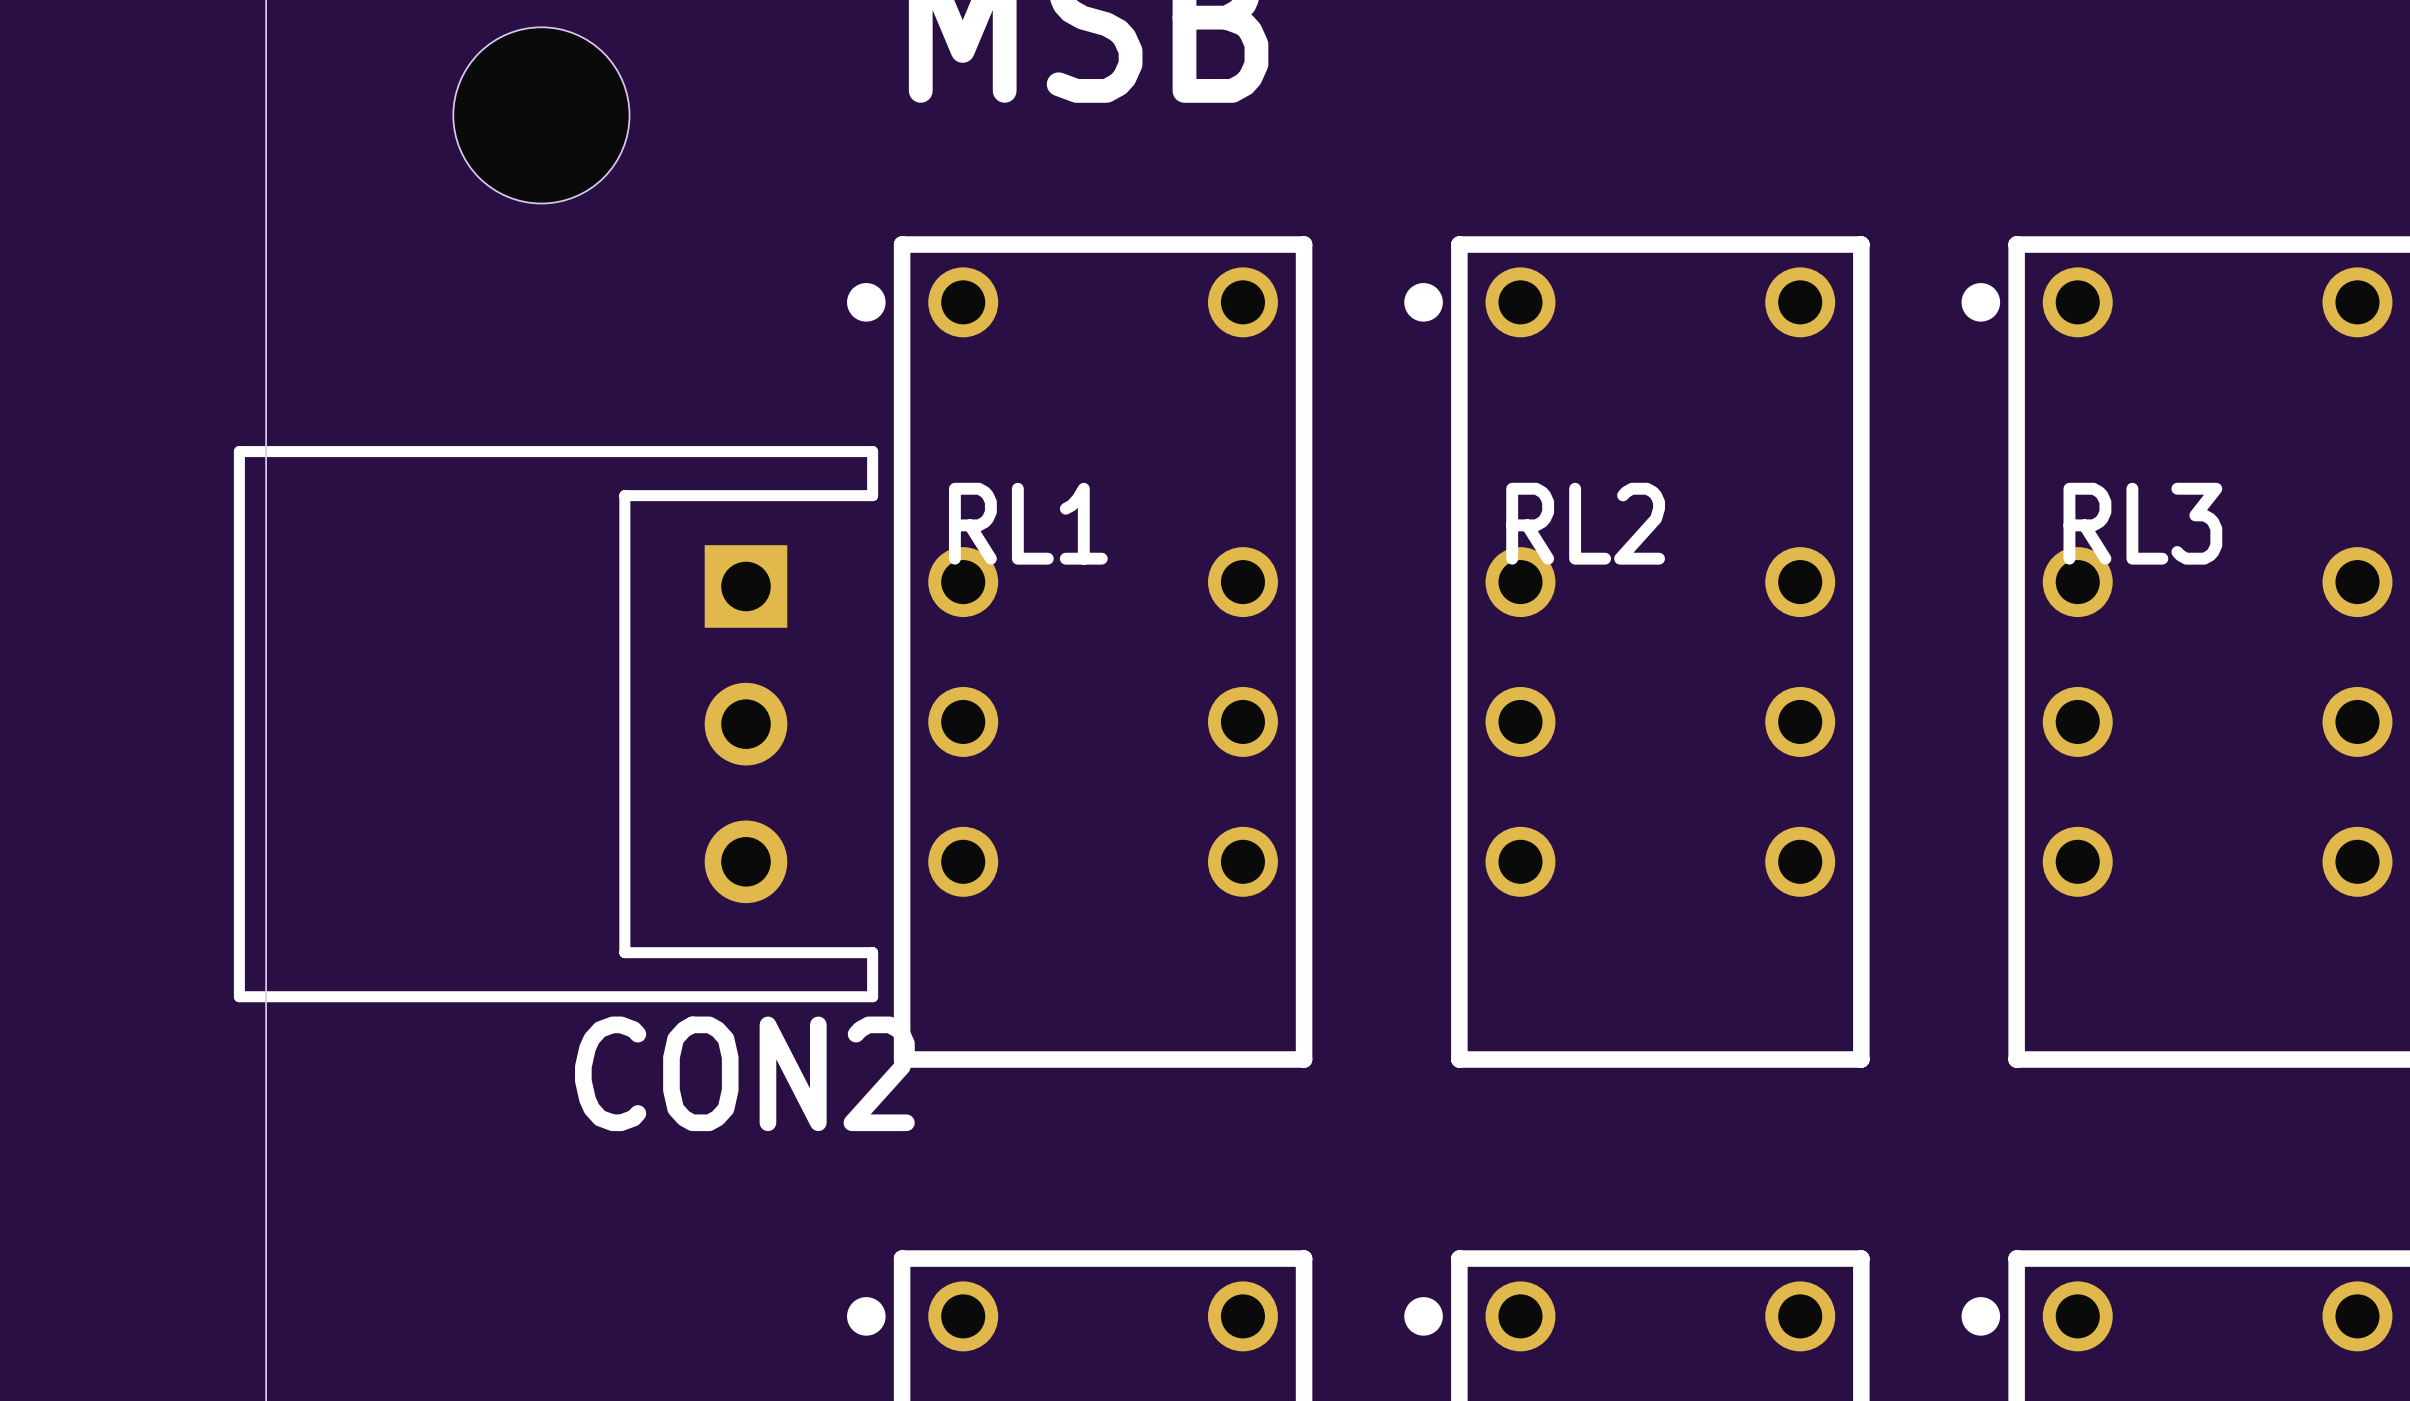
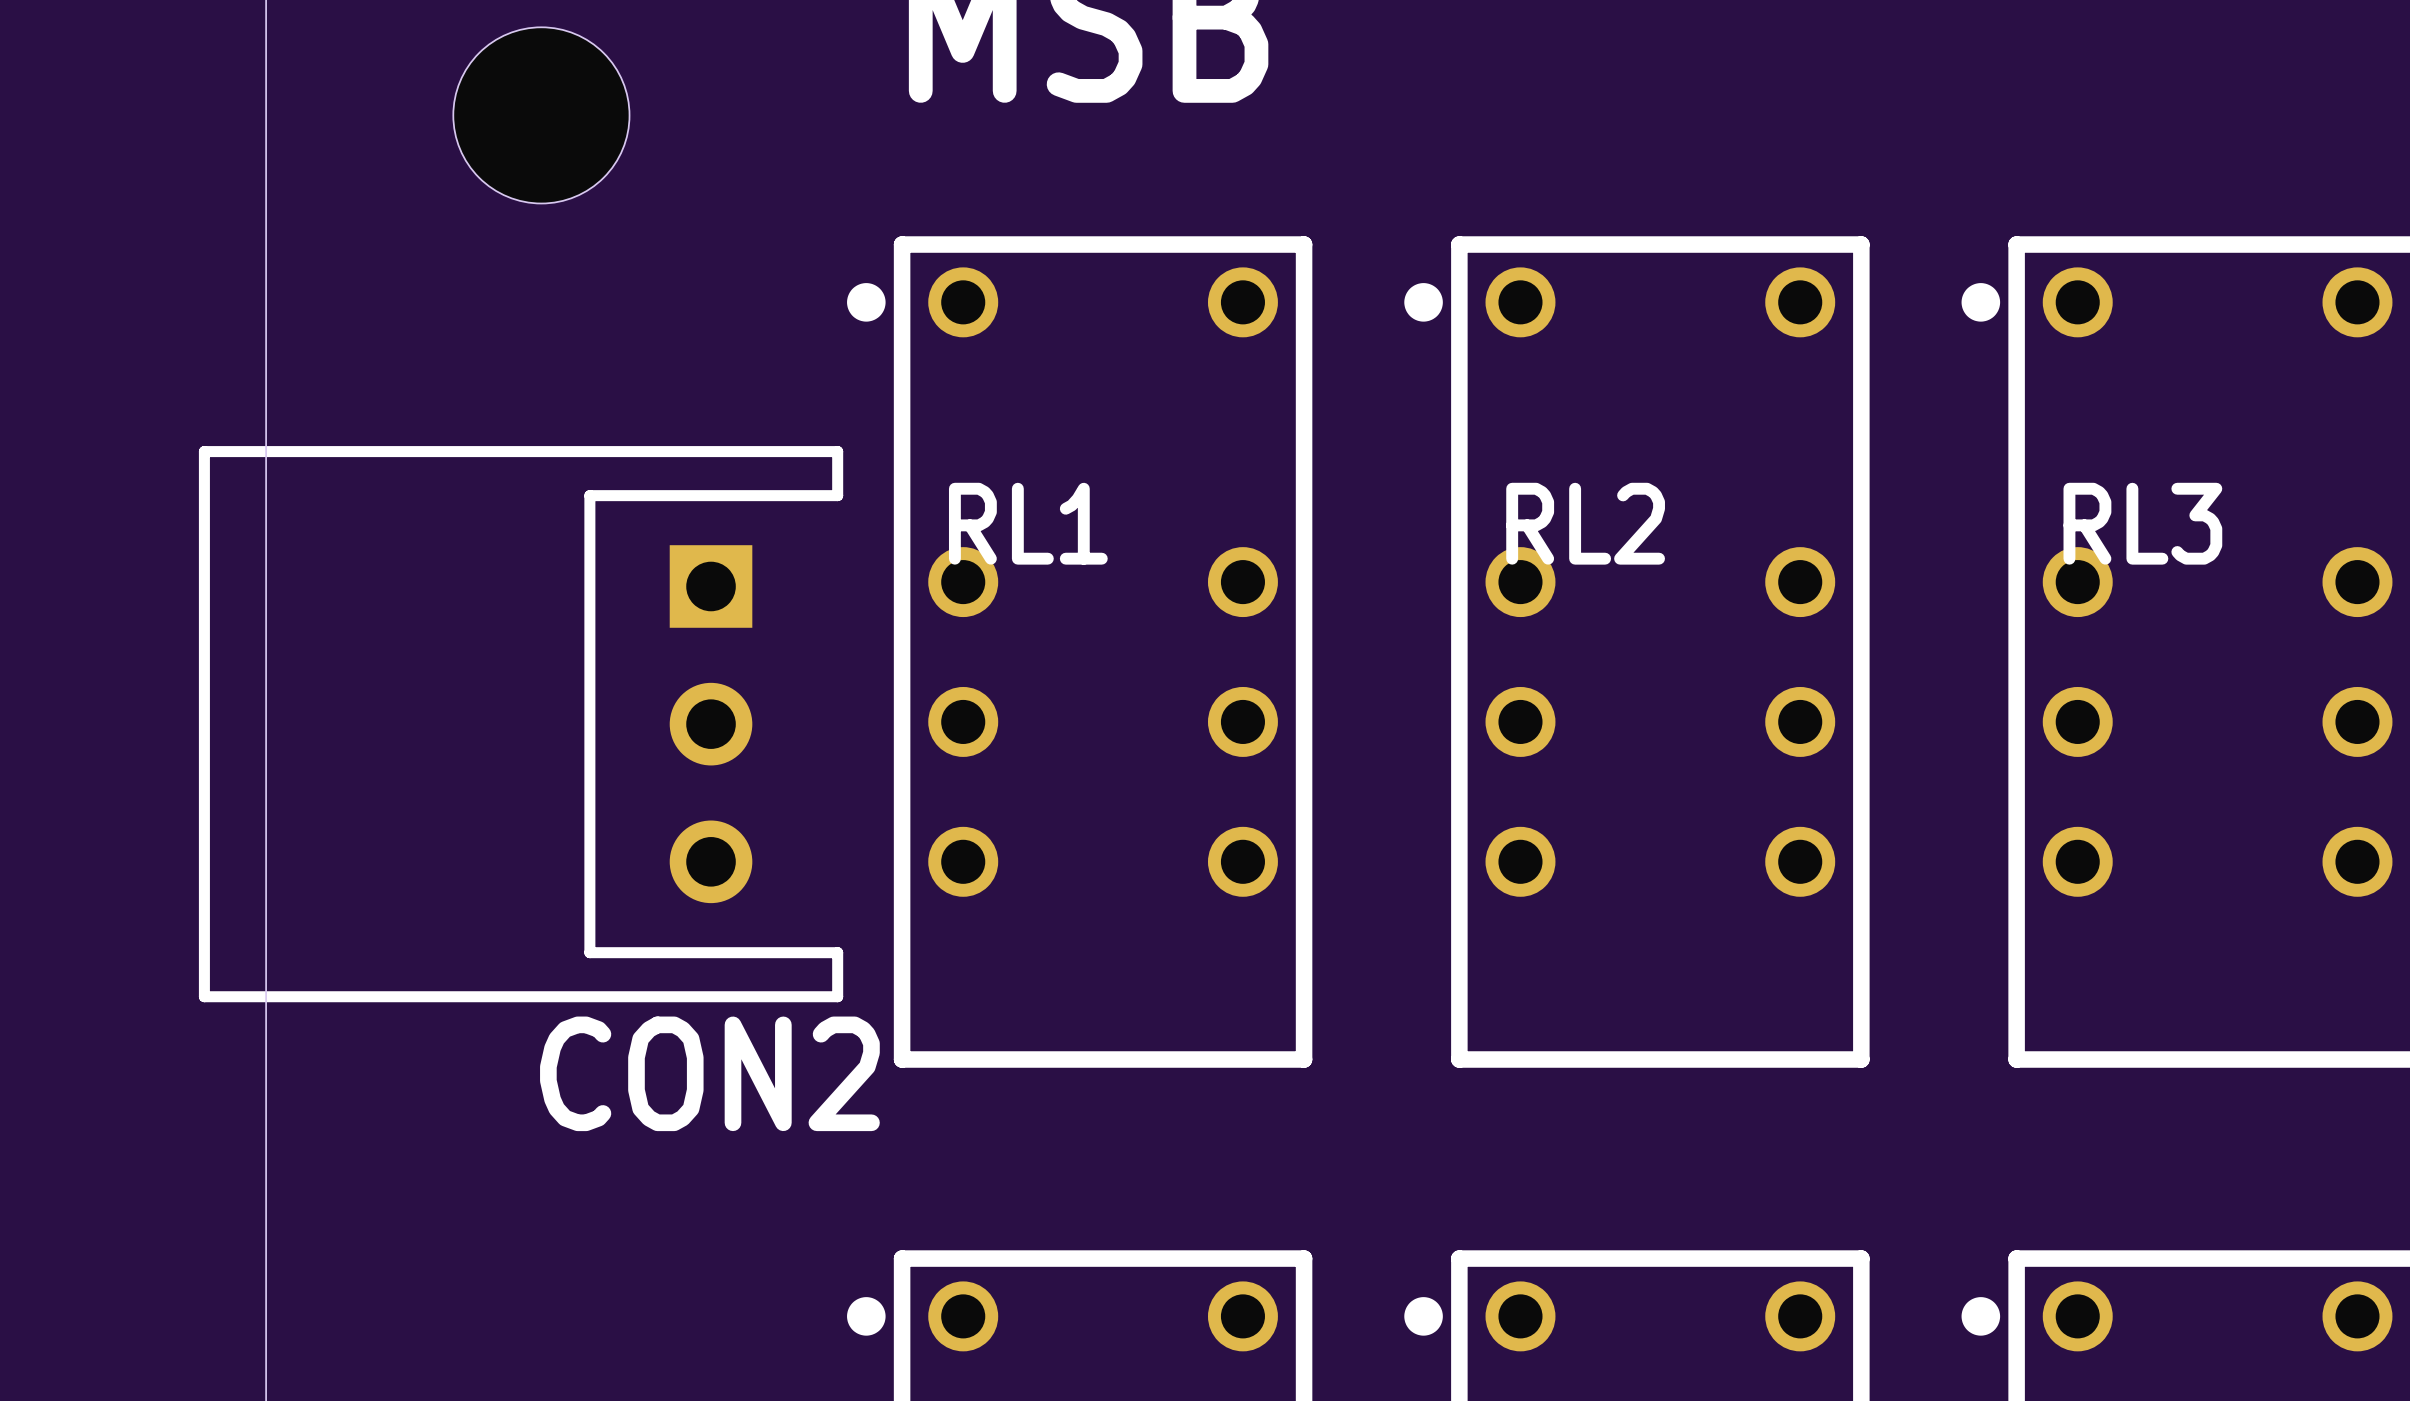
CON2 position: (556, 724) -> (521, 724)

